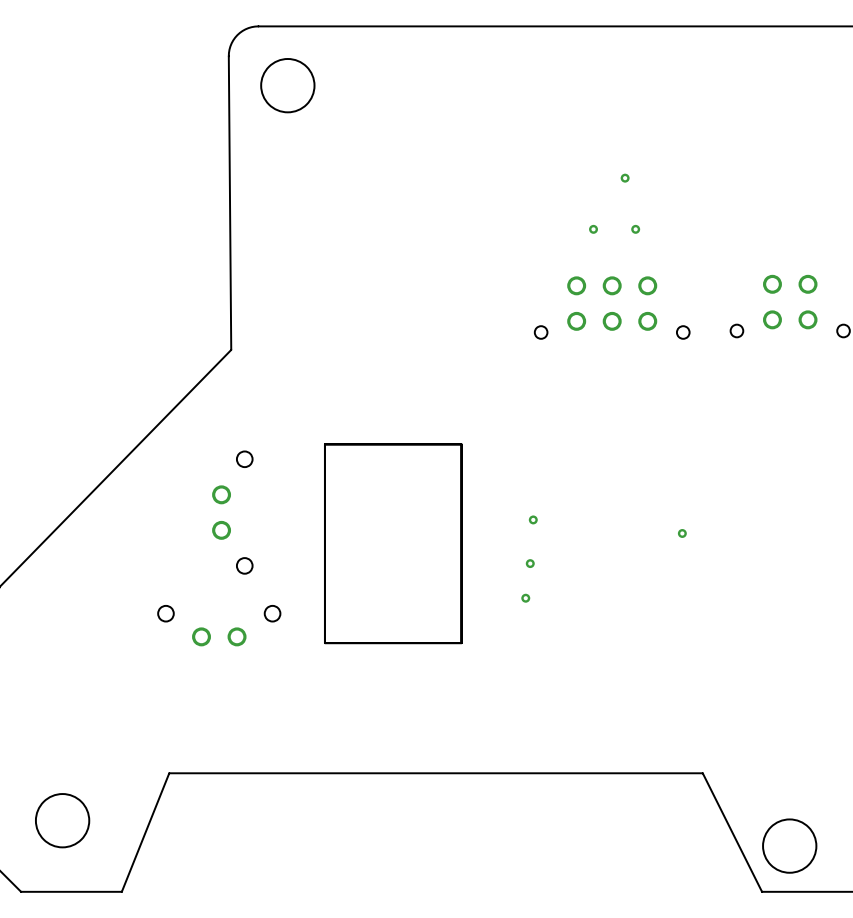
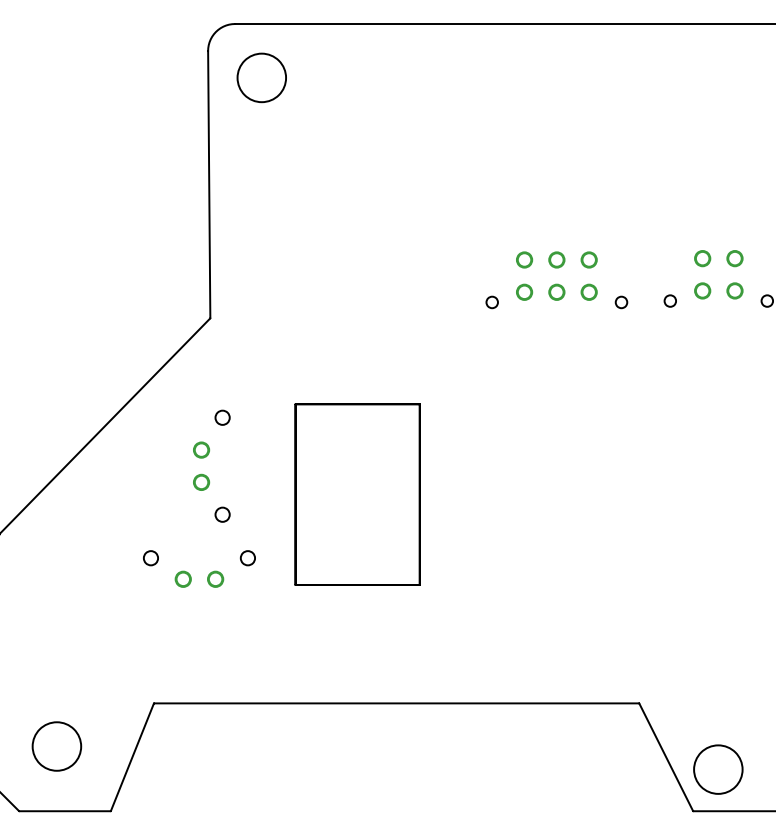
via: (625, 178) -> none
via: (593, 229) -> none
via: (635, 229) -> none
via: (533, 519) -> none
via: (682, 533) -> none
via: (530, 563) -> none
via: (525, 598) -> none

